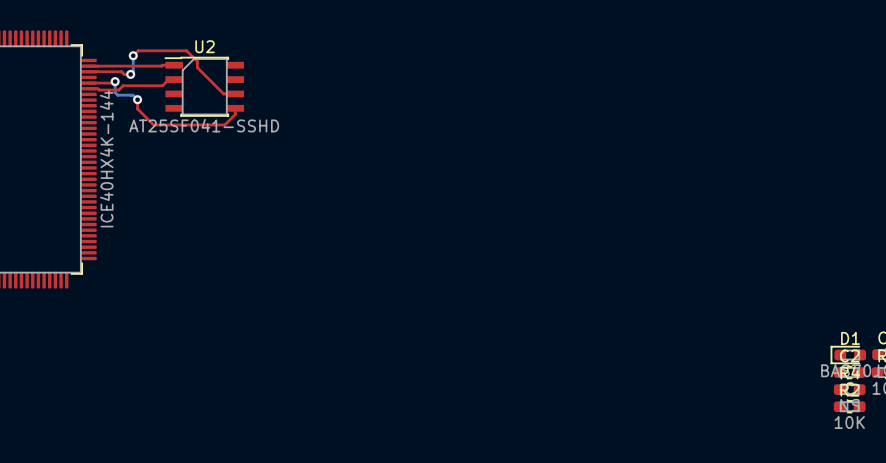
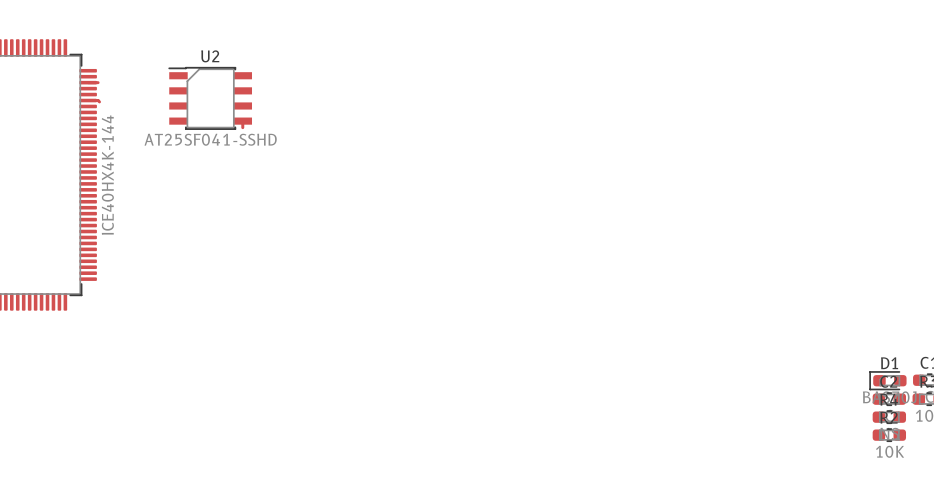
top track: (133, 55) (138, 50) (186, 50) (197, 61) (197, 67) (223, 93) (235, 93) -> none
bottom track: (133, 55) (133, 71) (130, 74) -> none
via: (133, 55) -> none
top track: (174, 65) (88, 66) -> none
top track: (97, 71) (121, 71) (124, 74) (130, 74) -> none
via: (130, 74) -> none
top track: (174, 79) (168, 79) (162, 85) (123, 85) (118, 90) (99, 90) -> none
top track: (115, 81) (88, 83) -> none
bottom track: (115, 81) (115, 92) (117, 95) (133, 95) (137, 99) -> none
via: (115, 81) -> none
top track: (137, 99) (137, 108) (153, 124) (224, 124) (235, 114) -> none
via: (137, 99) -> none

